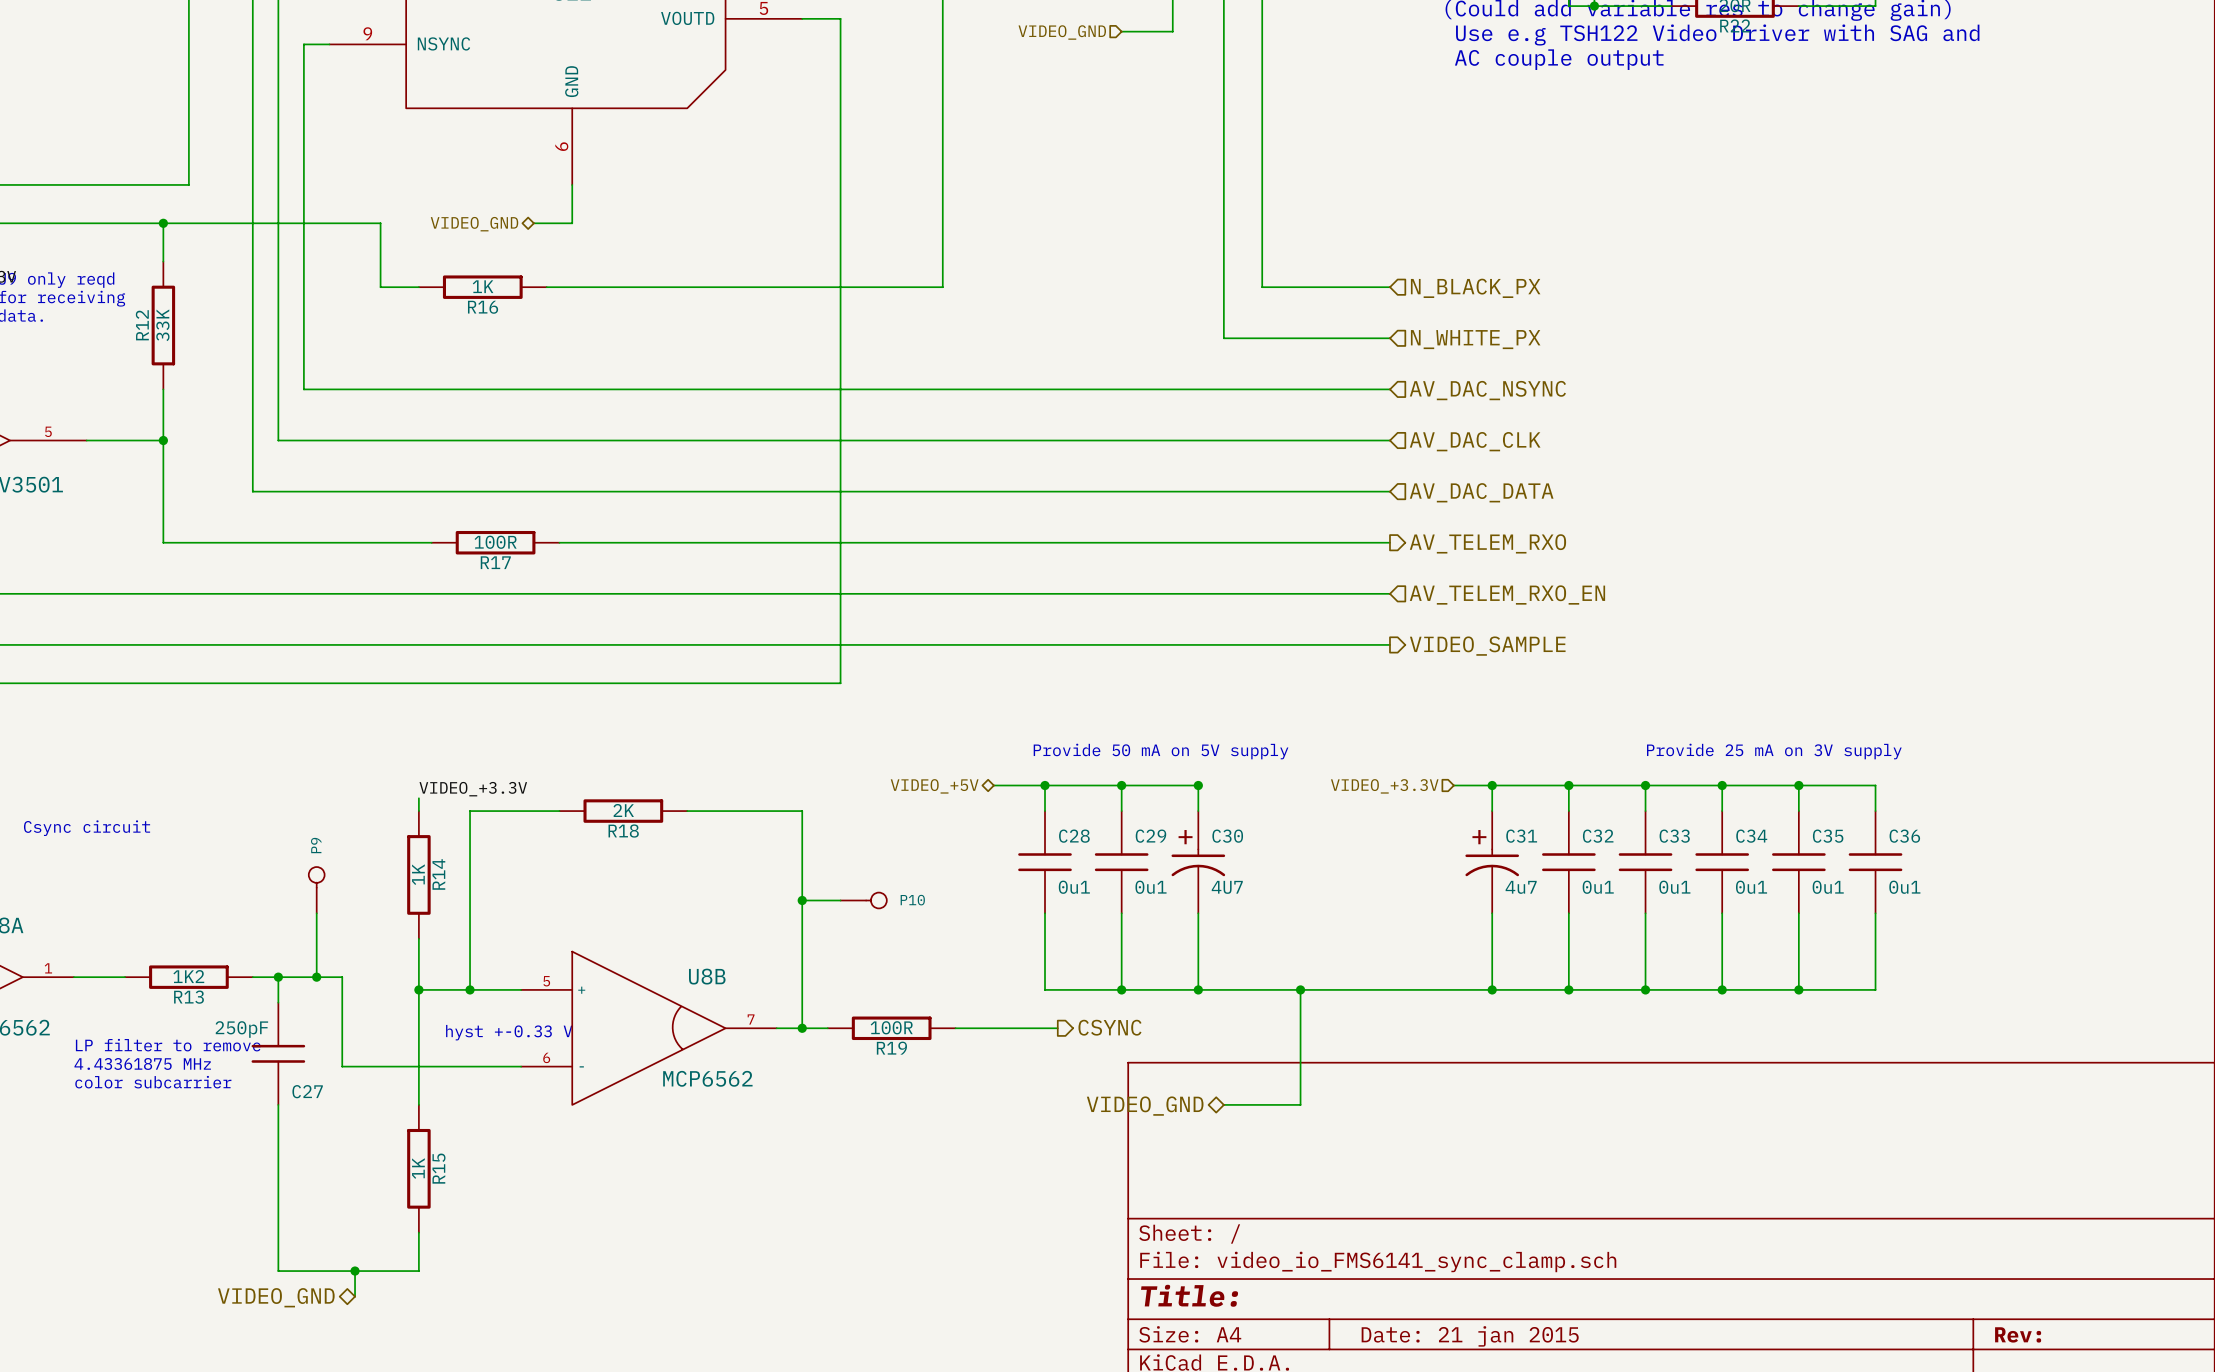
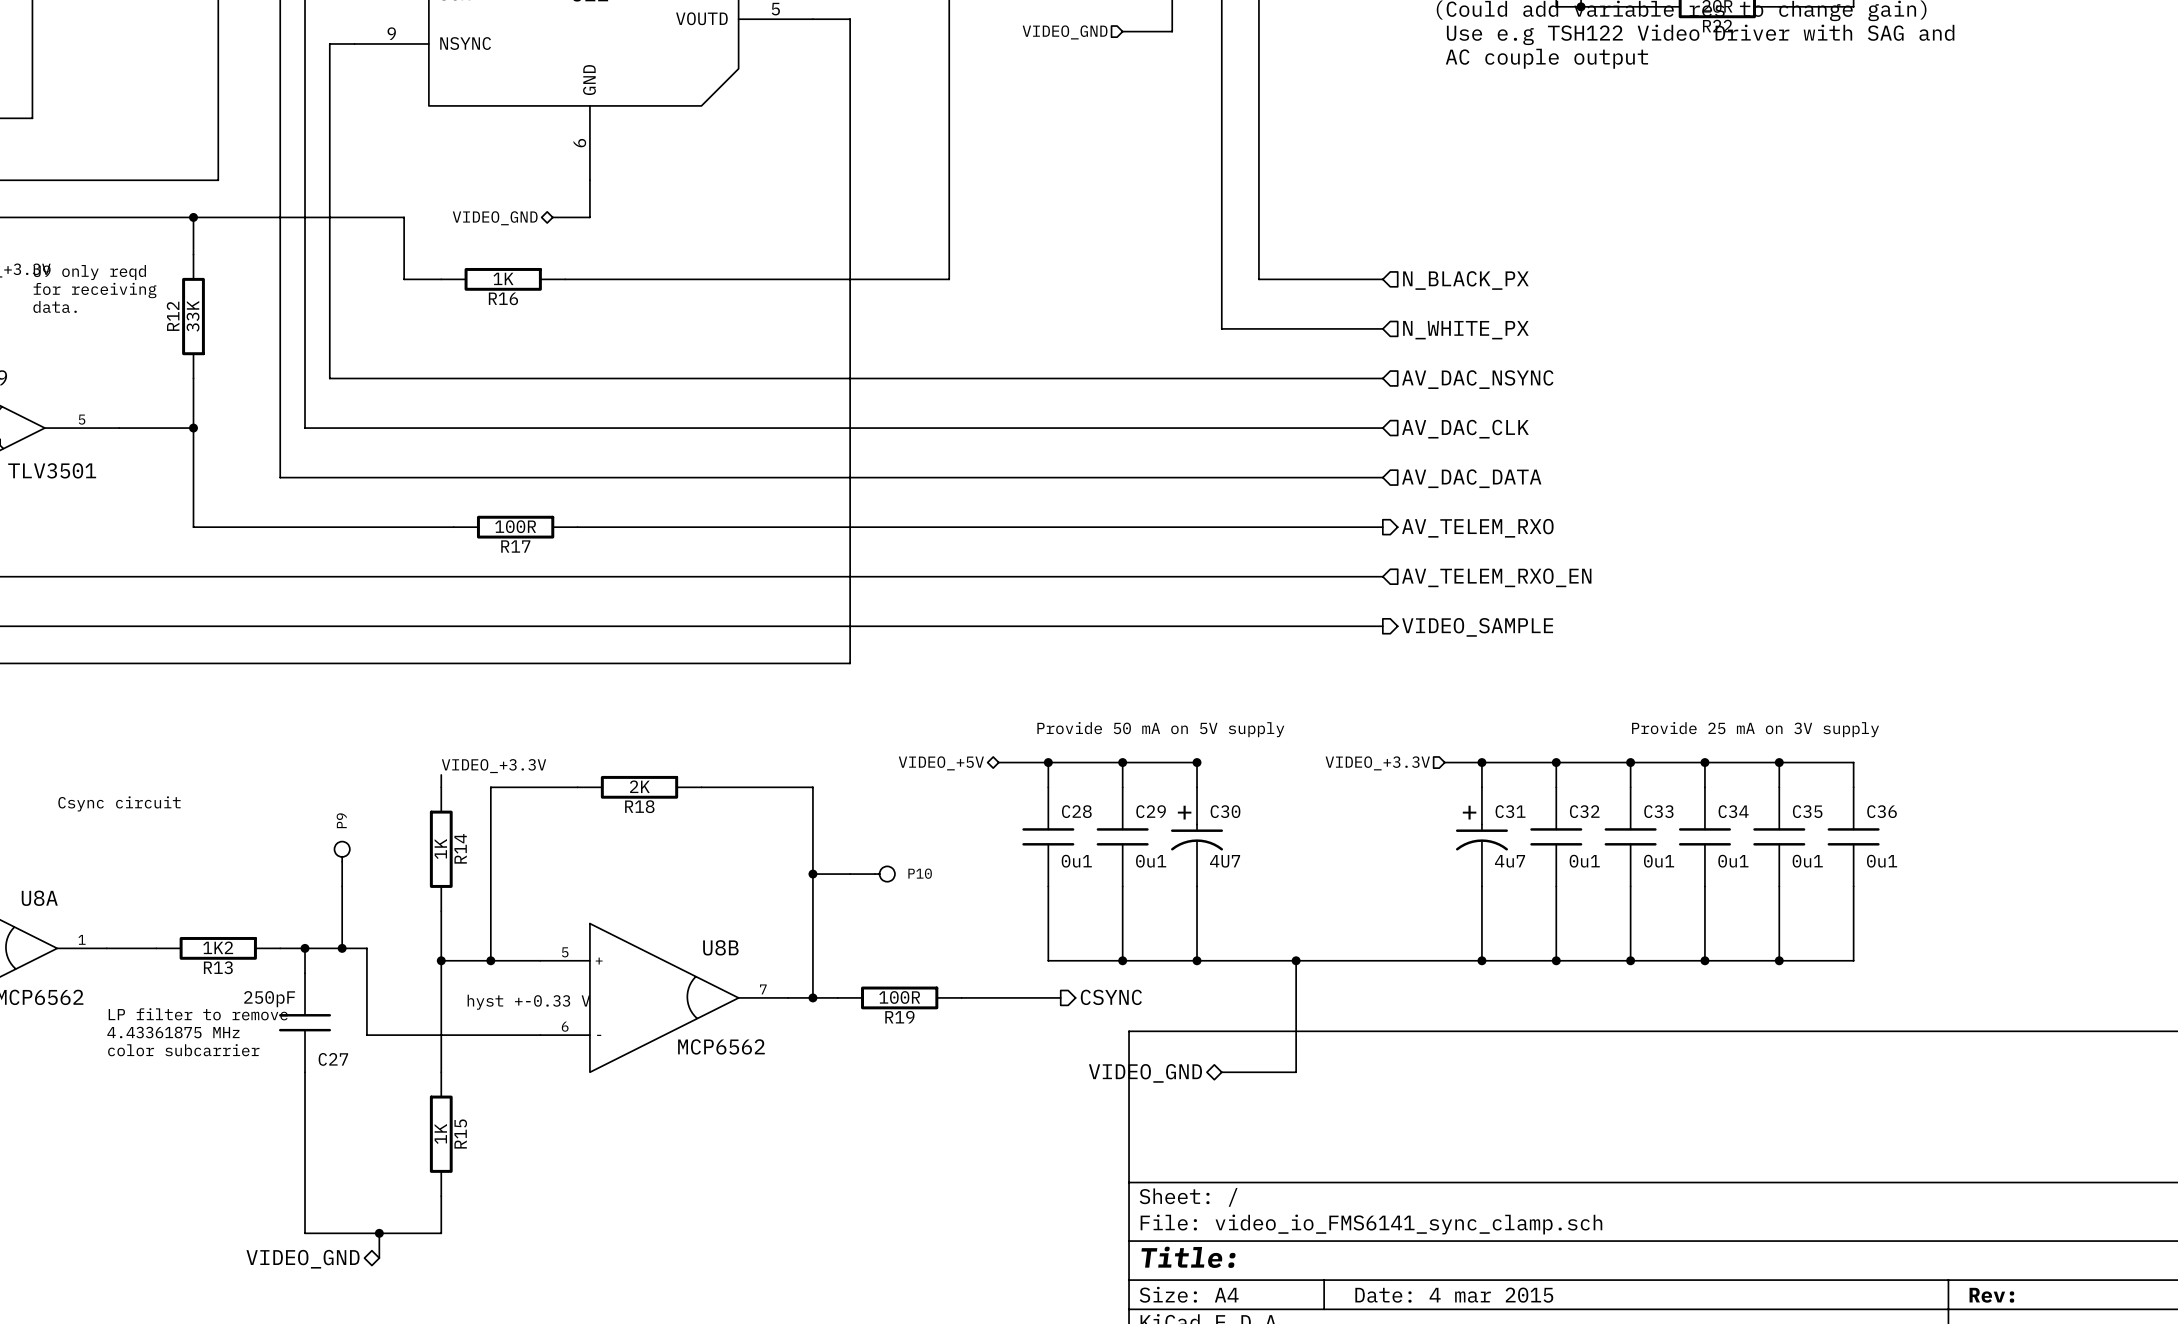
title block: Date: 21 jan 2015 (1470, 1336) -> Date: 4 mar 2015 (1454, 1295)

